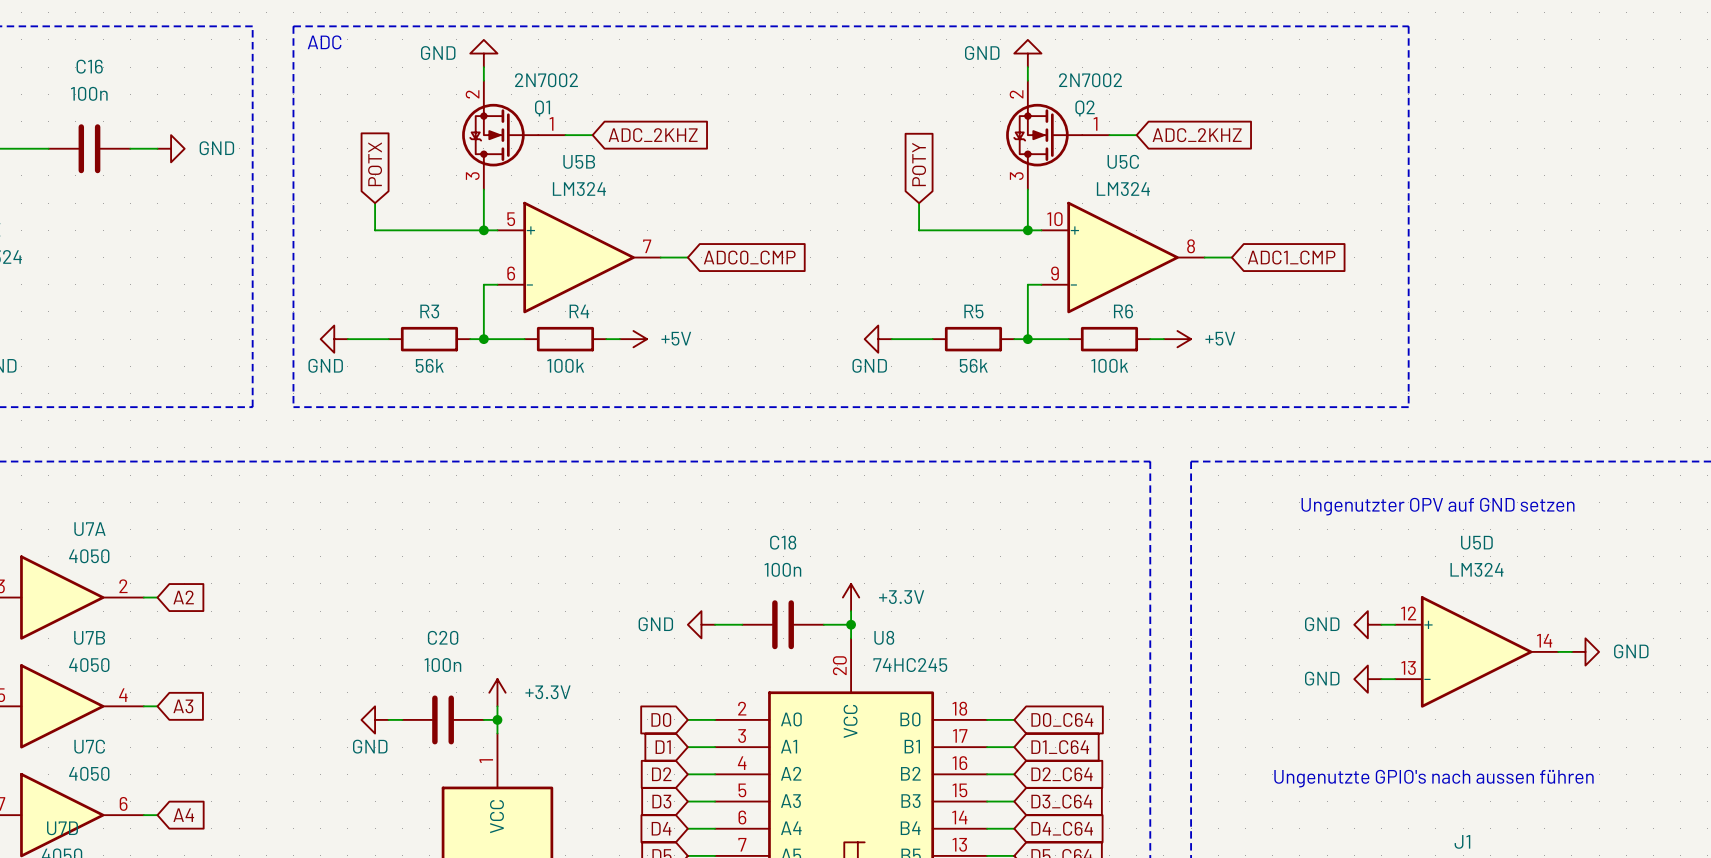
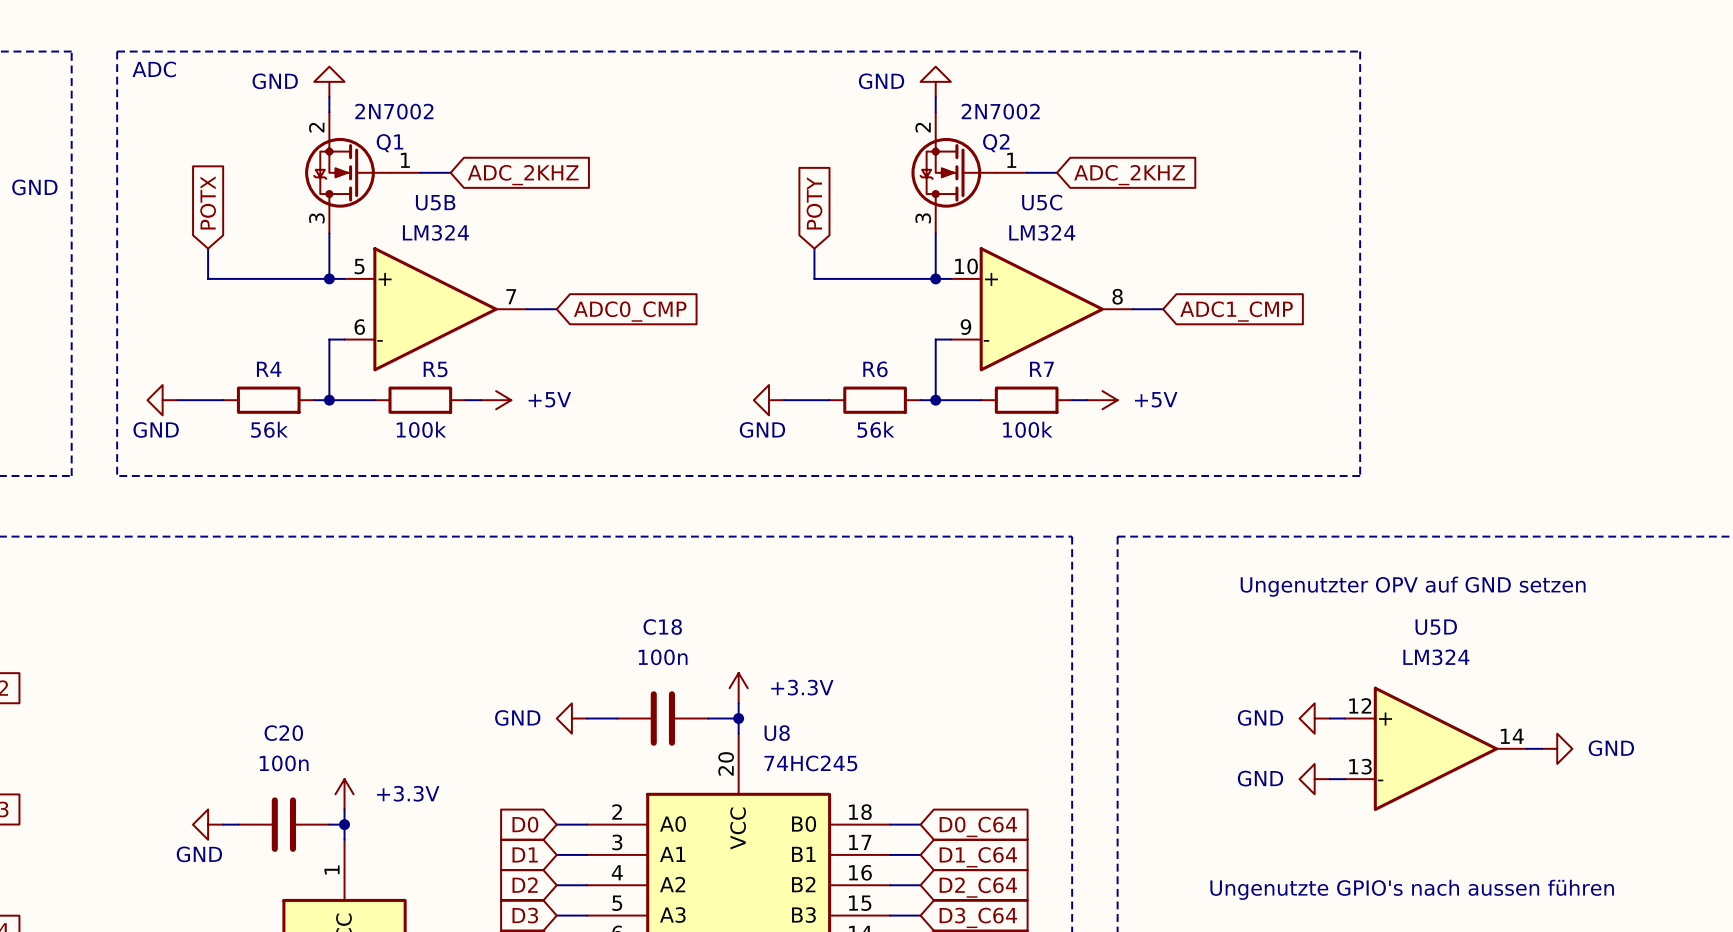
R3 name: R3 (429, 311) -> R4 (269, 369)
R4 name: R4 (579, 311) -> R5 (435, 369)
R5 name: R5 (973, 311) -> R6 (875, 369)
R6 name: R6 (1123, 311) -> R7 (1041, 369)

